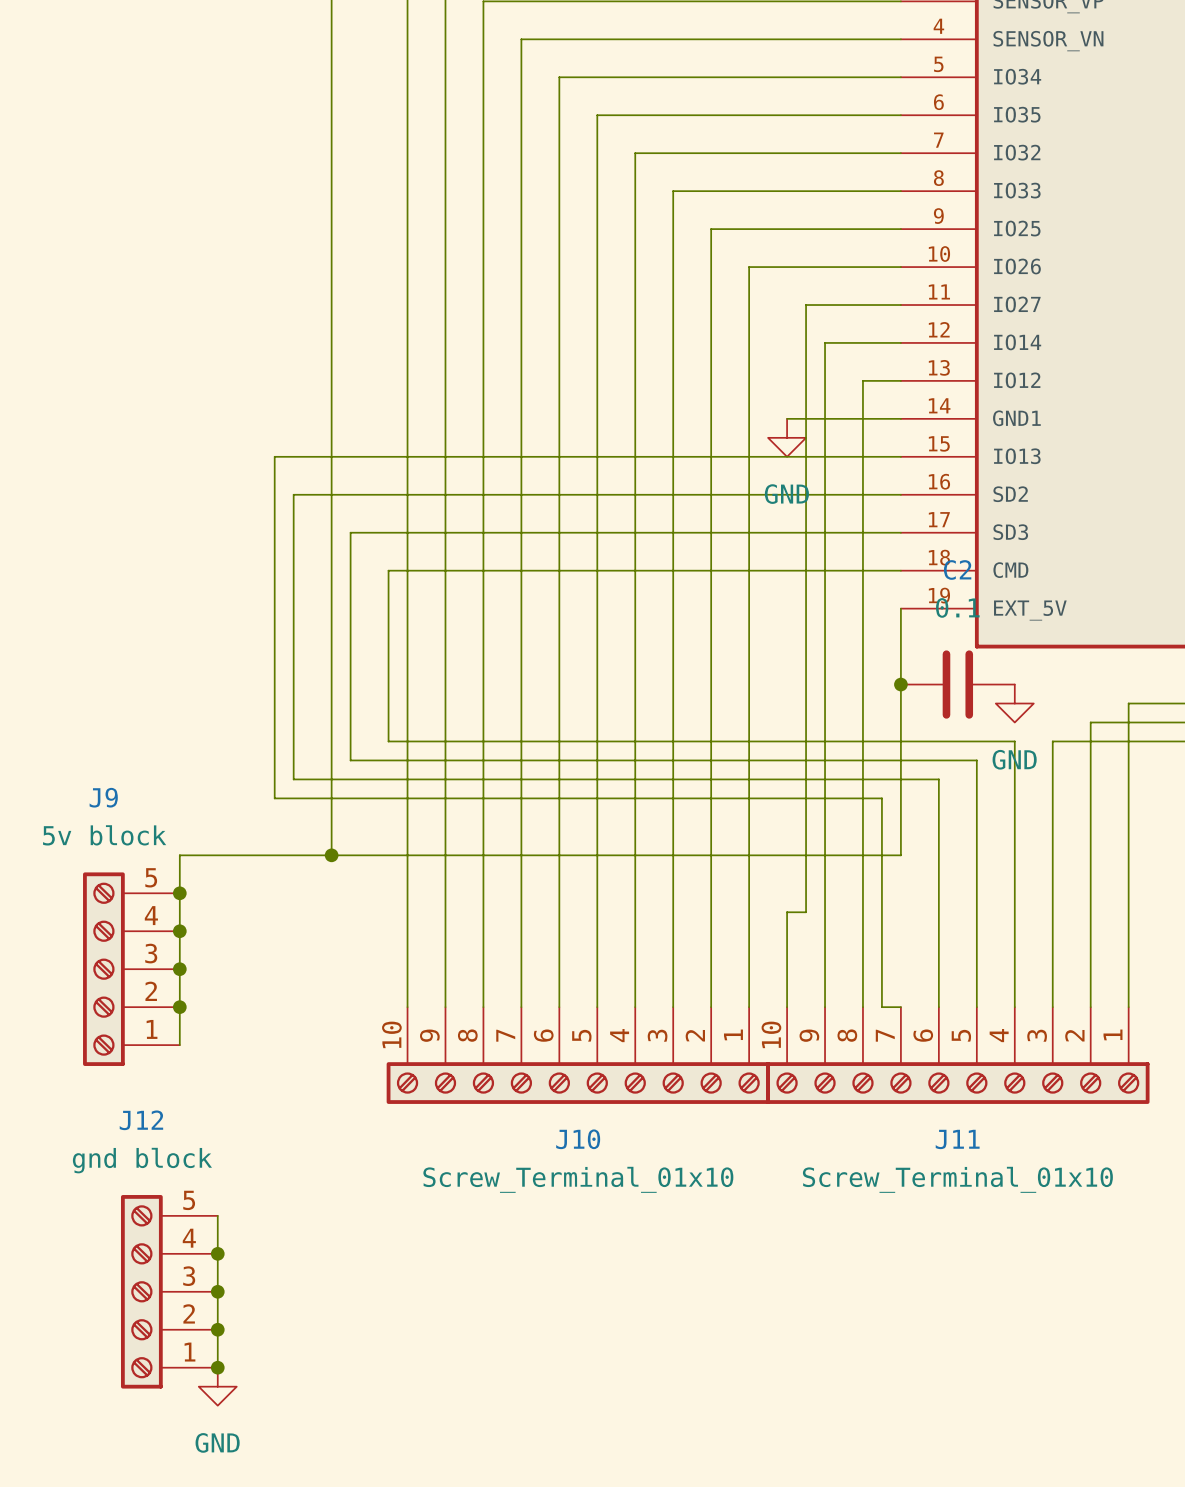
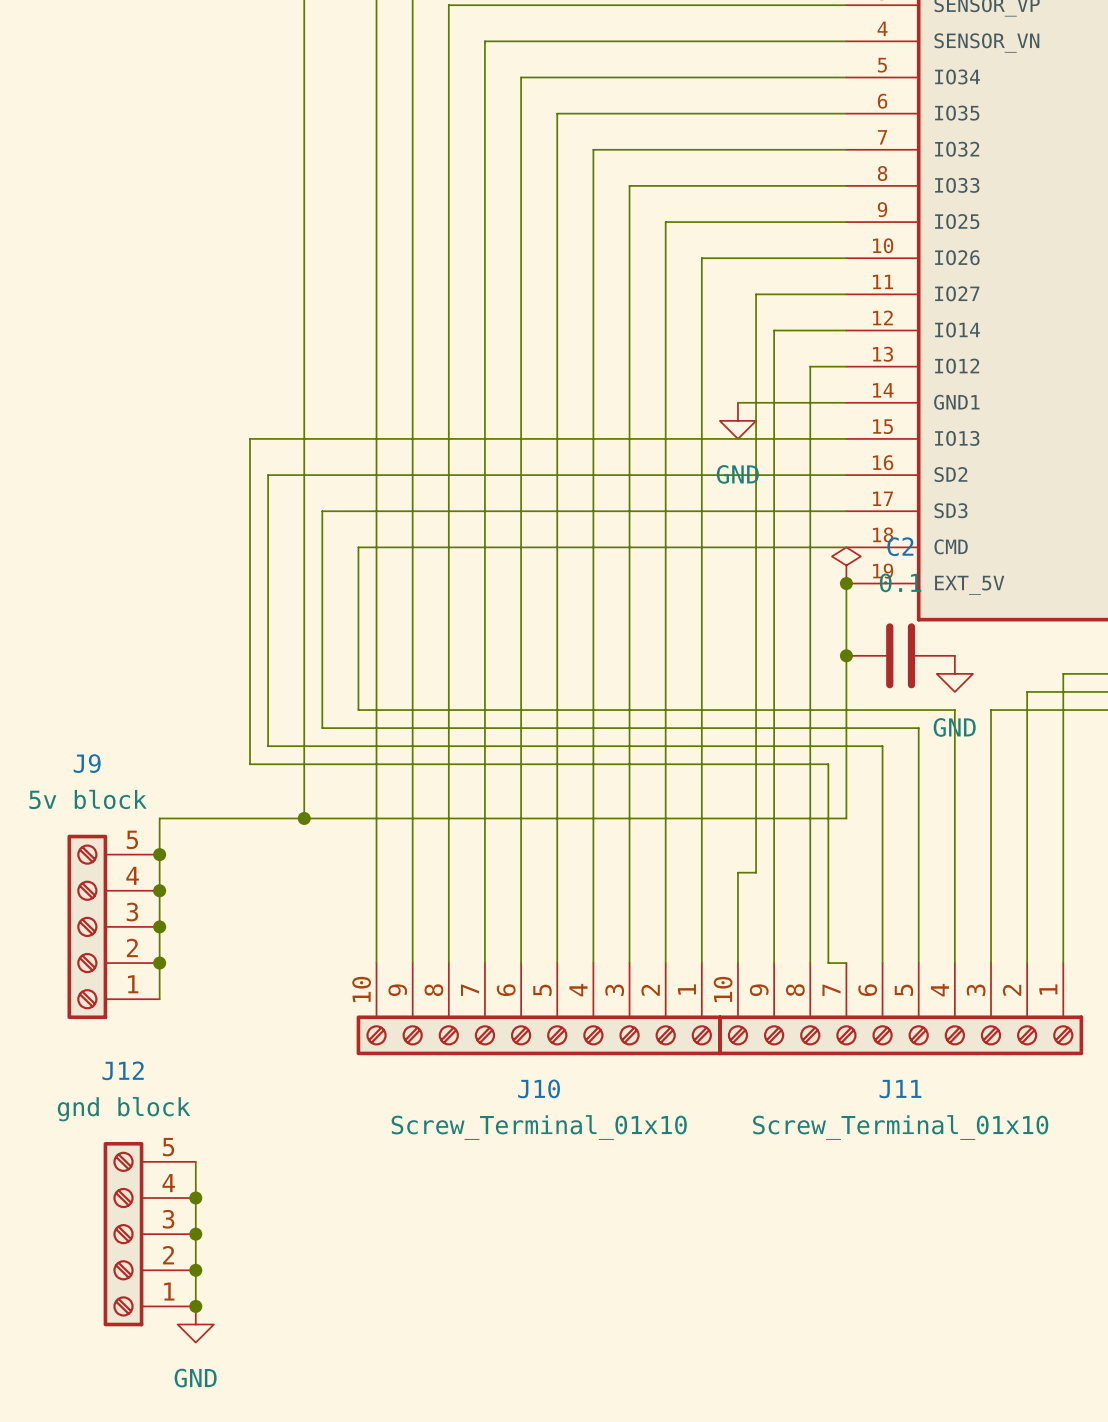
power symbol: none -> (846, 565)
junction: none -> (846, 583)

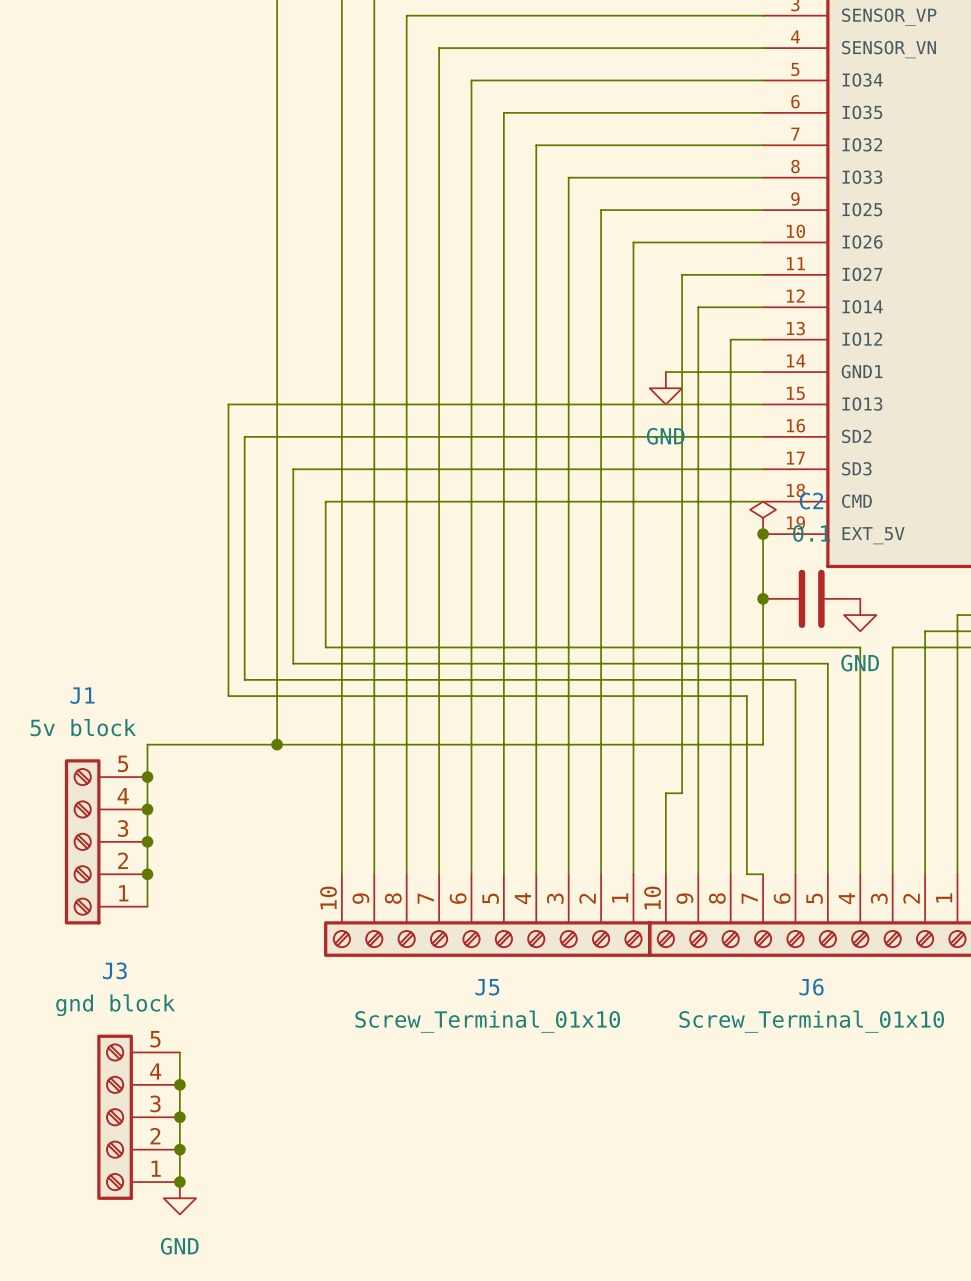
J9 name: J9 (87, 763) -> J1 (82, 695)
J12 name: J12 (123, 1070) -> J3 (114, 970)
J10 name: J10 (539, 1088) -> J5 (487, 987)
J11 name: J11 (900, 1089) -> J6 (811, 987)

